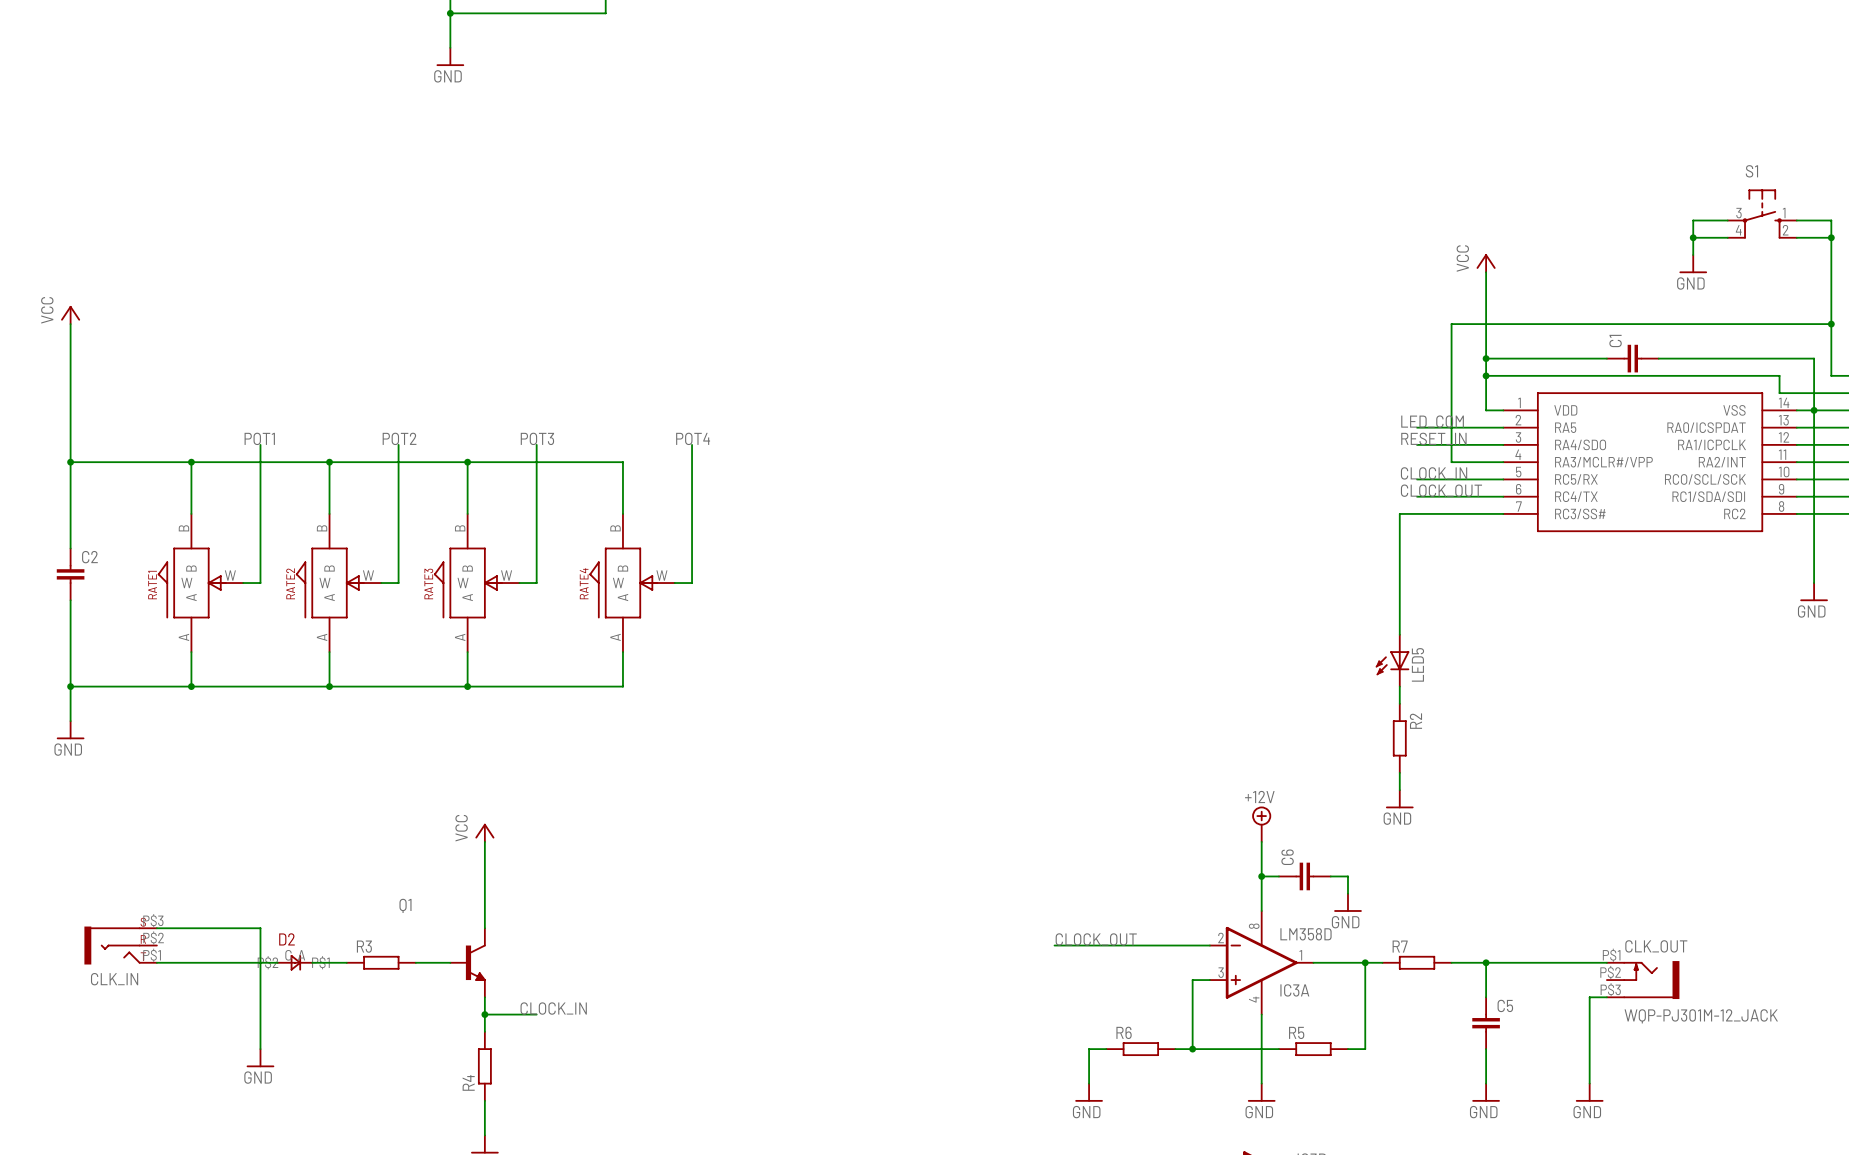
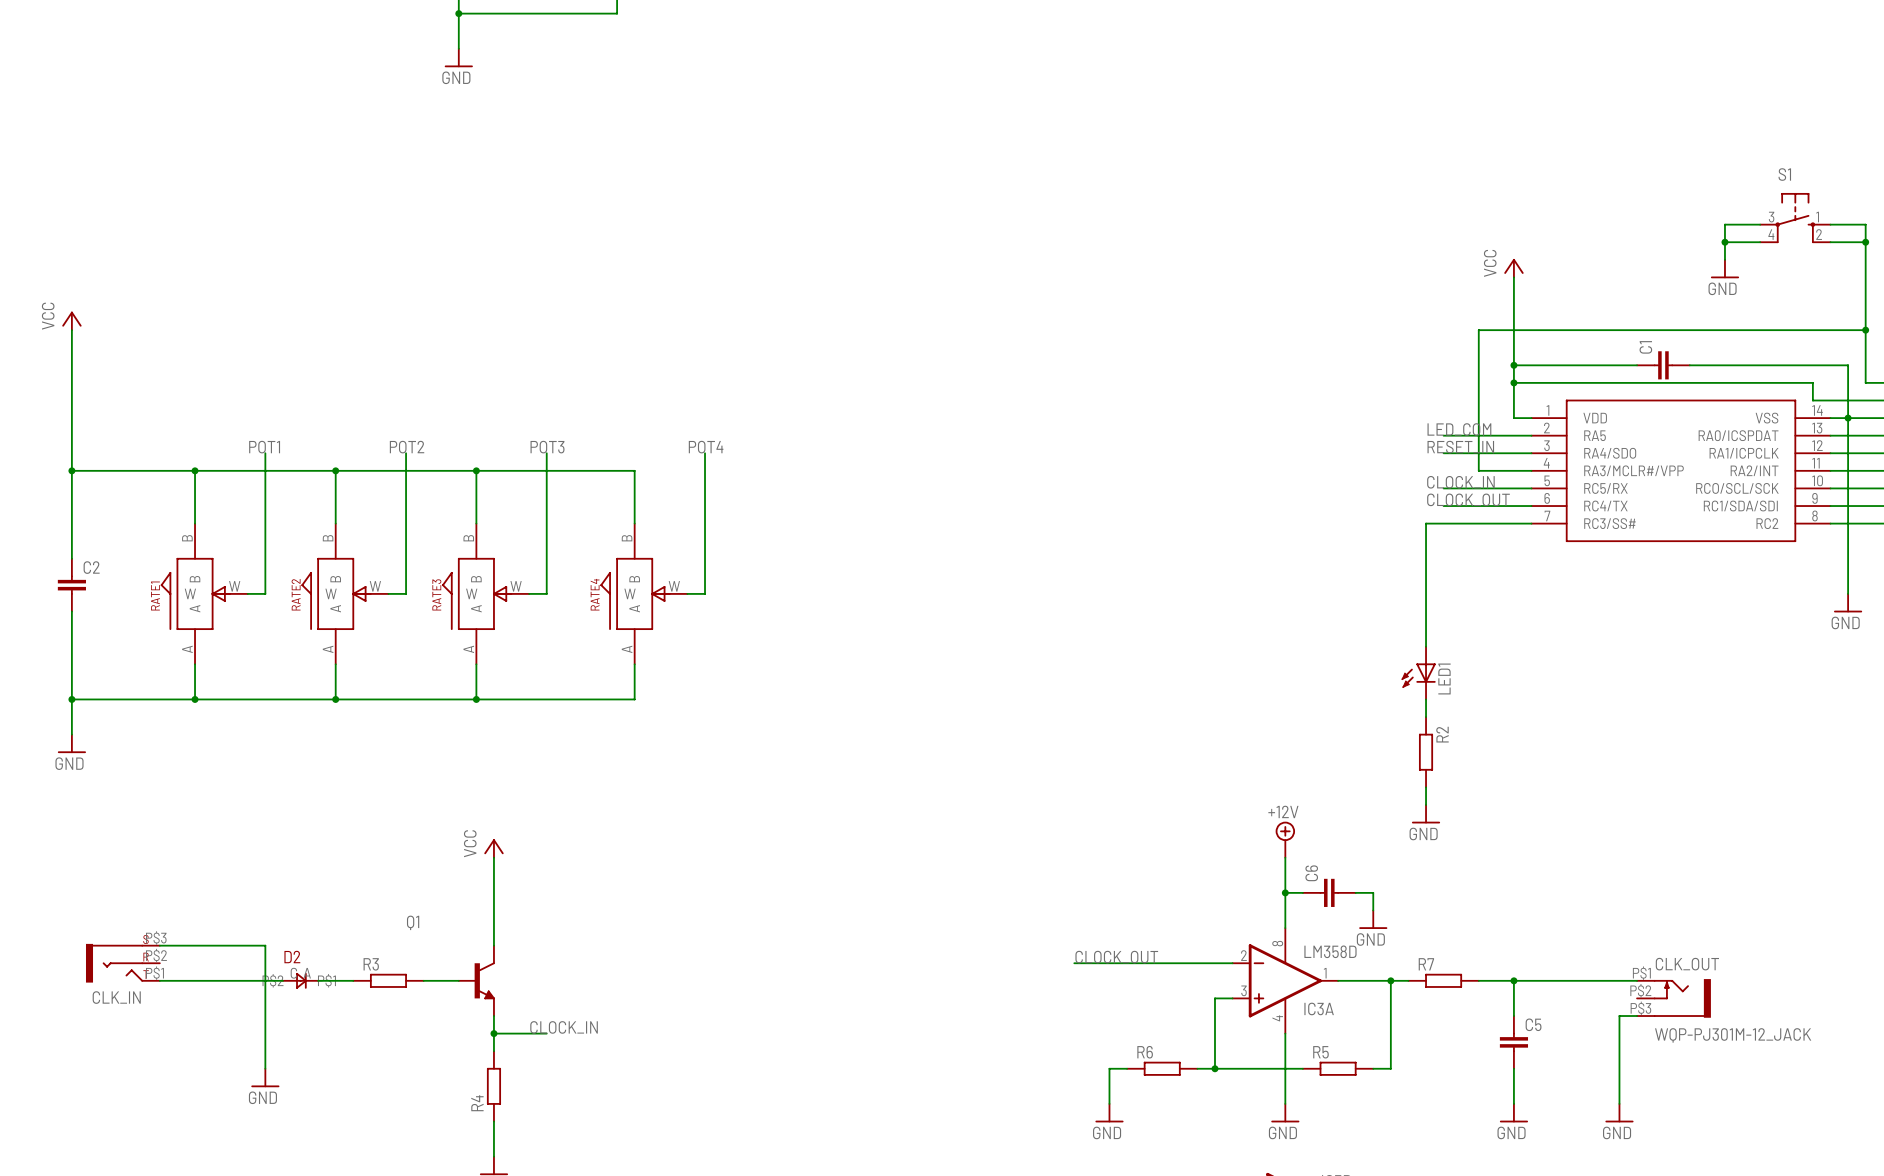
LED5 name: LED5 (1417, 664) -> LED1 (1444, 678)

